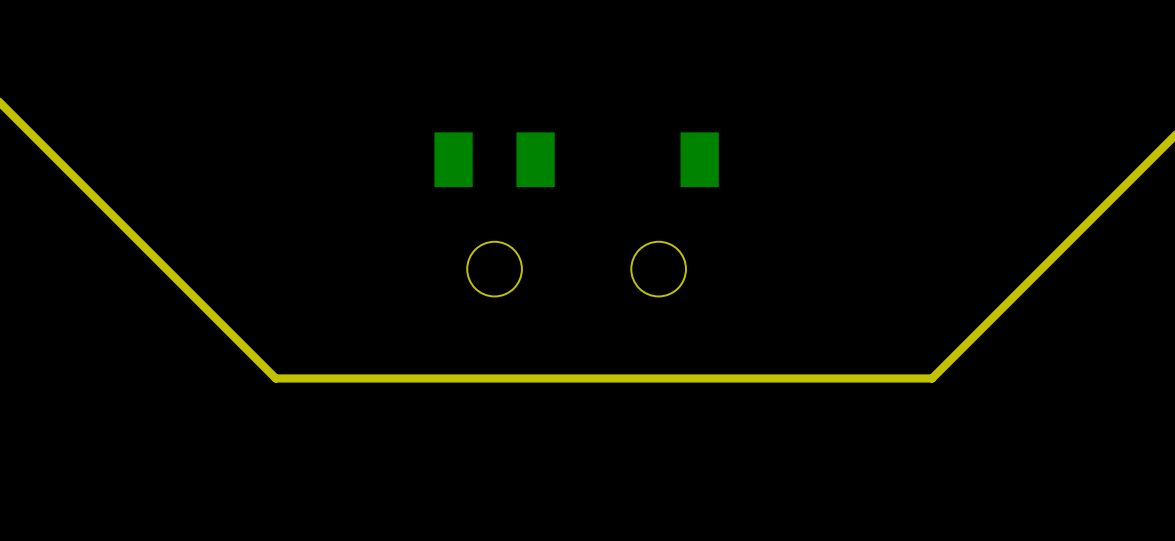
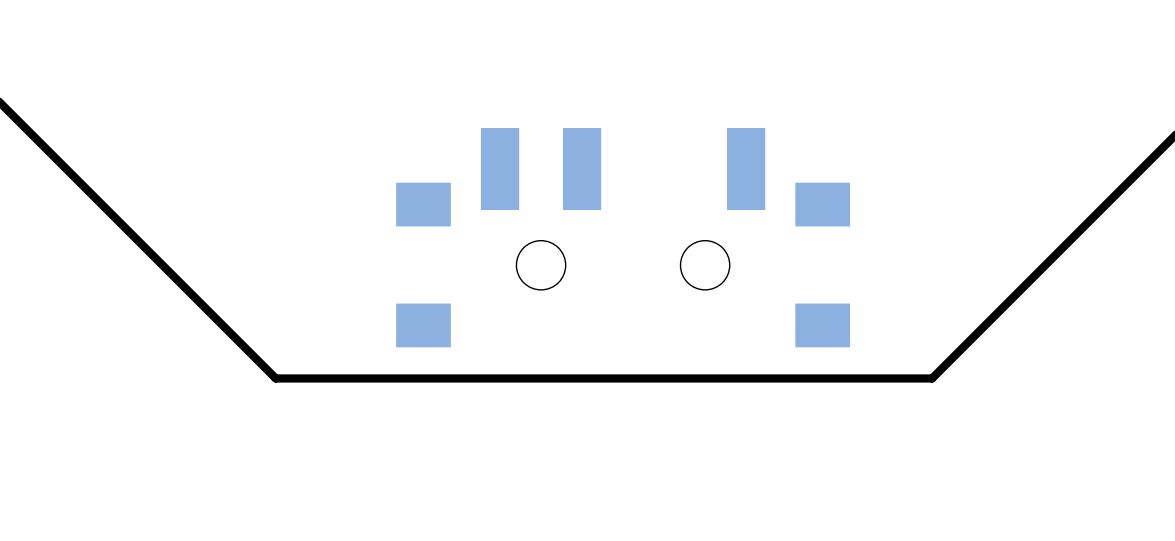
part footprint: [434, 132, 719, 297] -> [396, 128, 851, 348]

